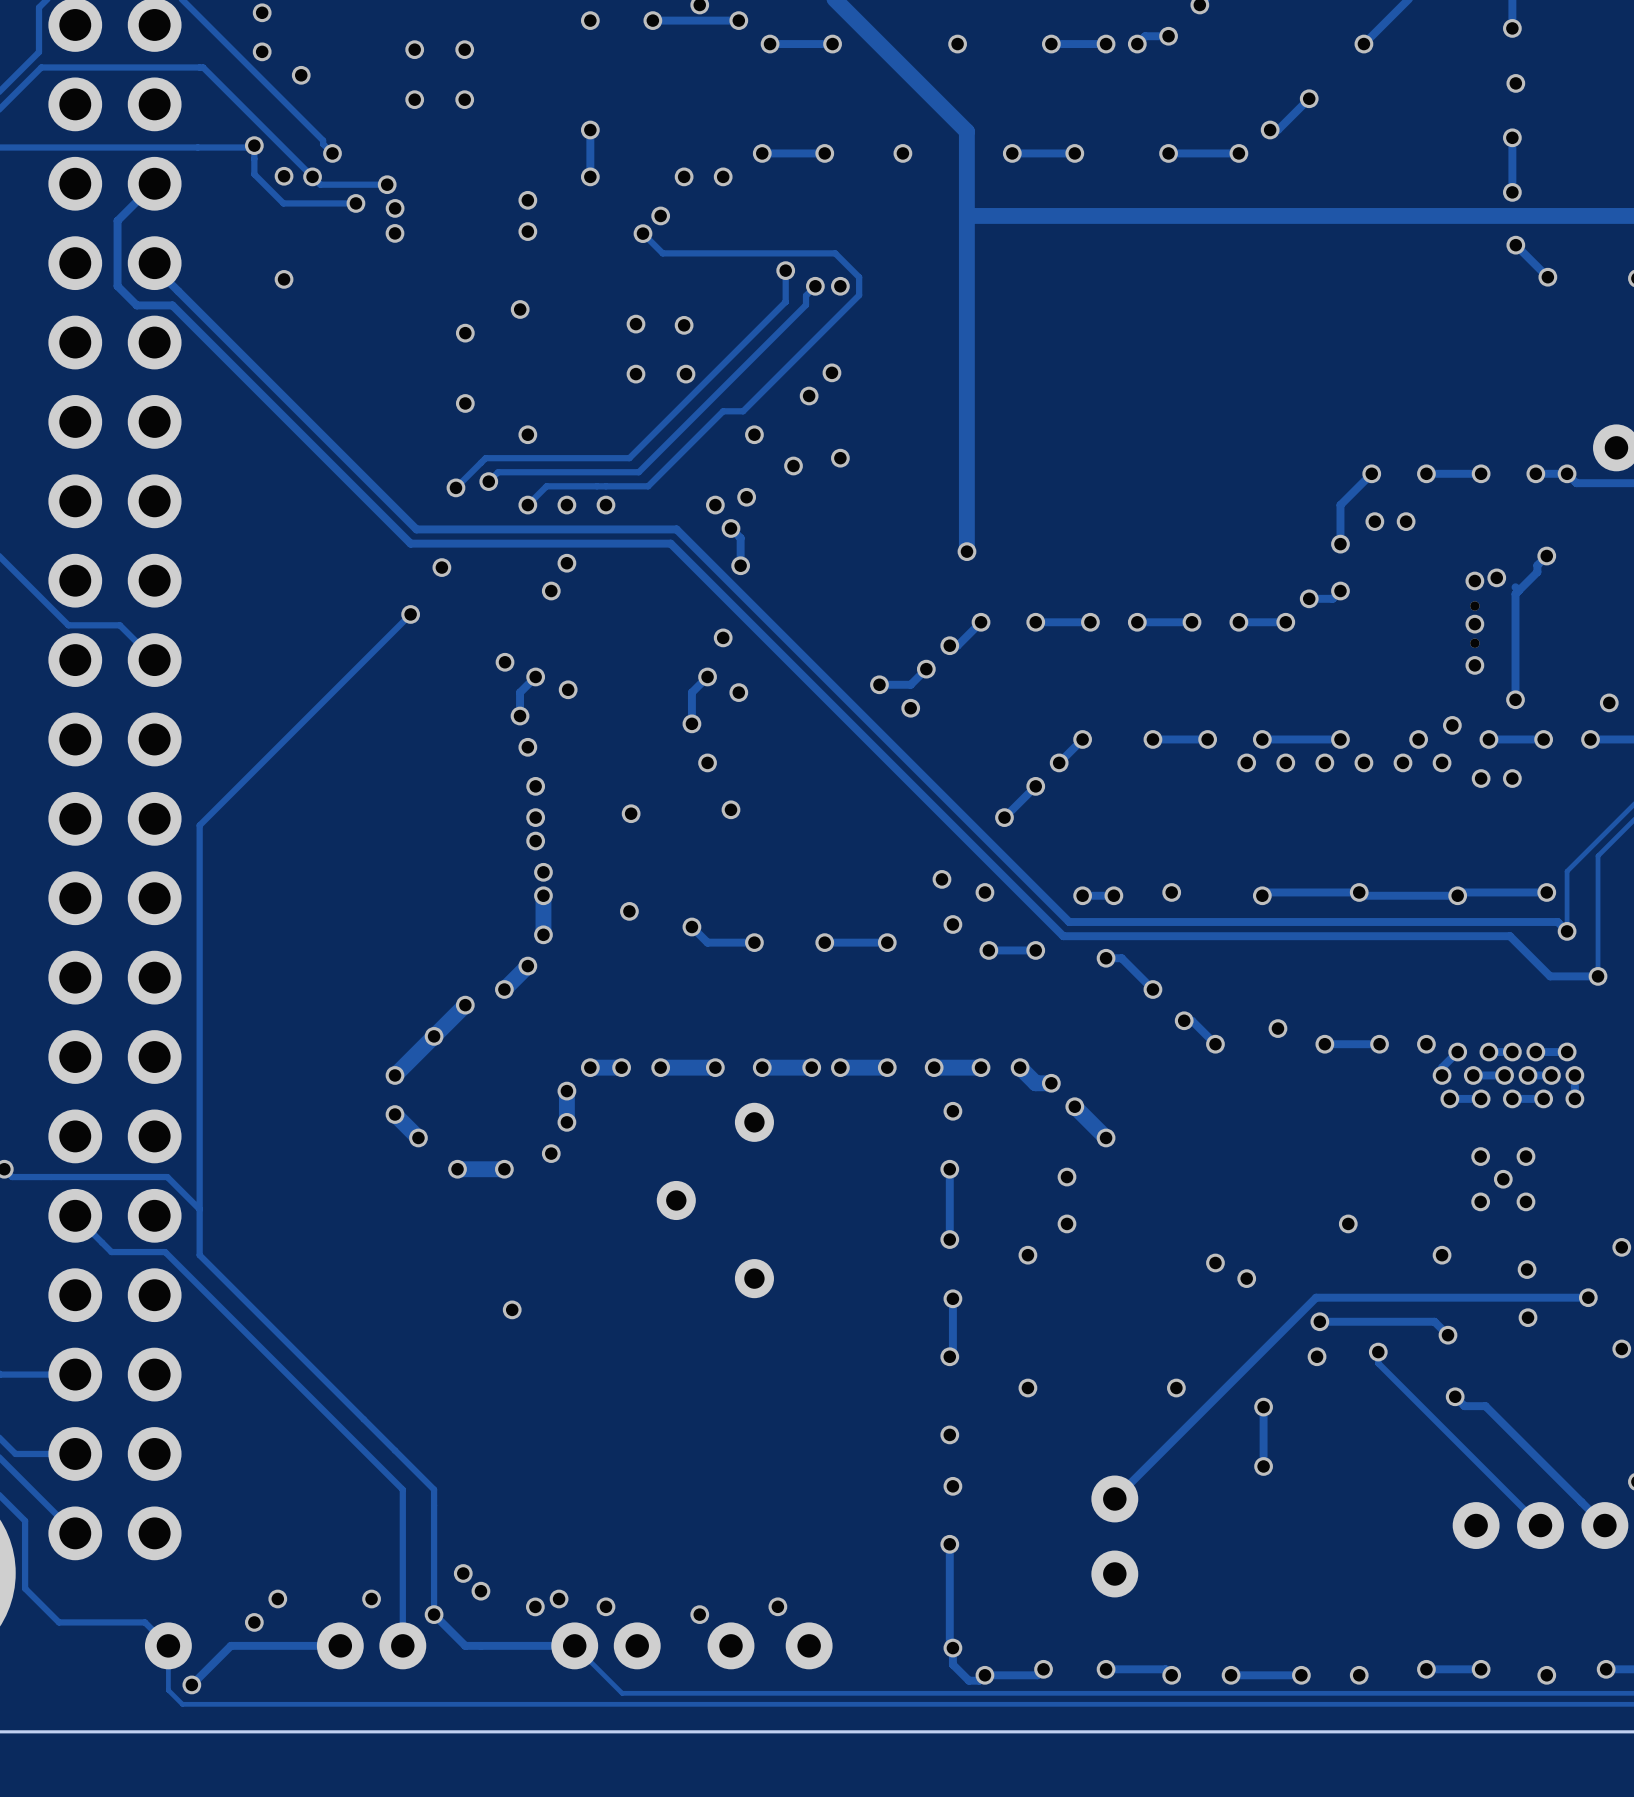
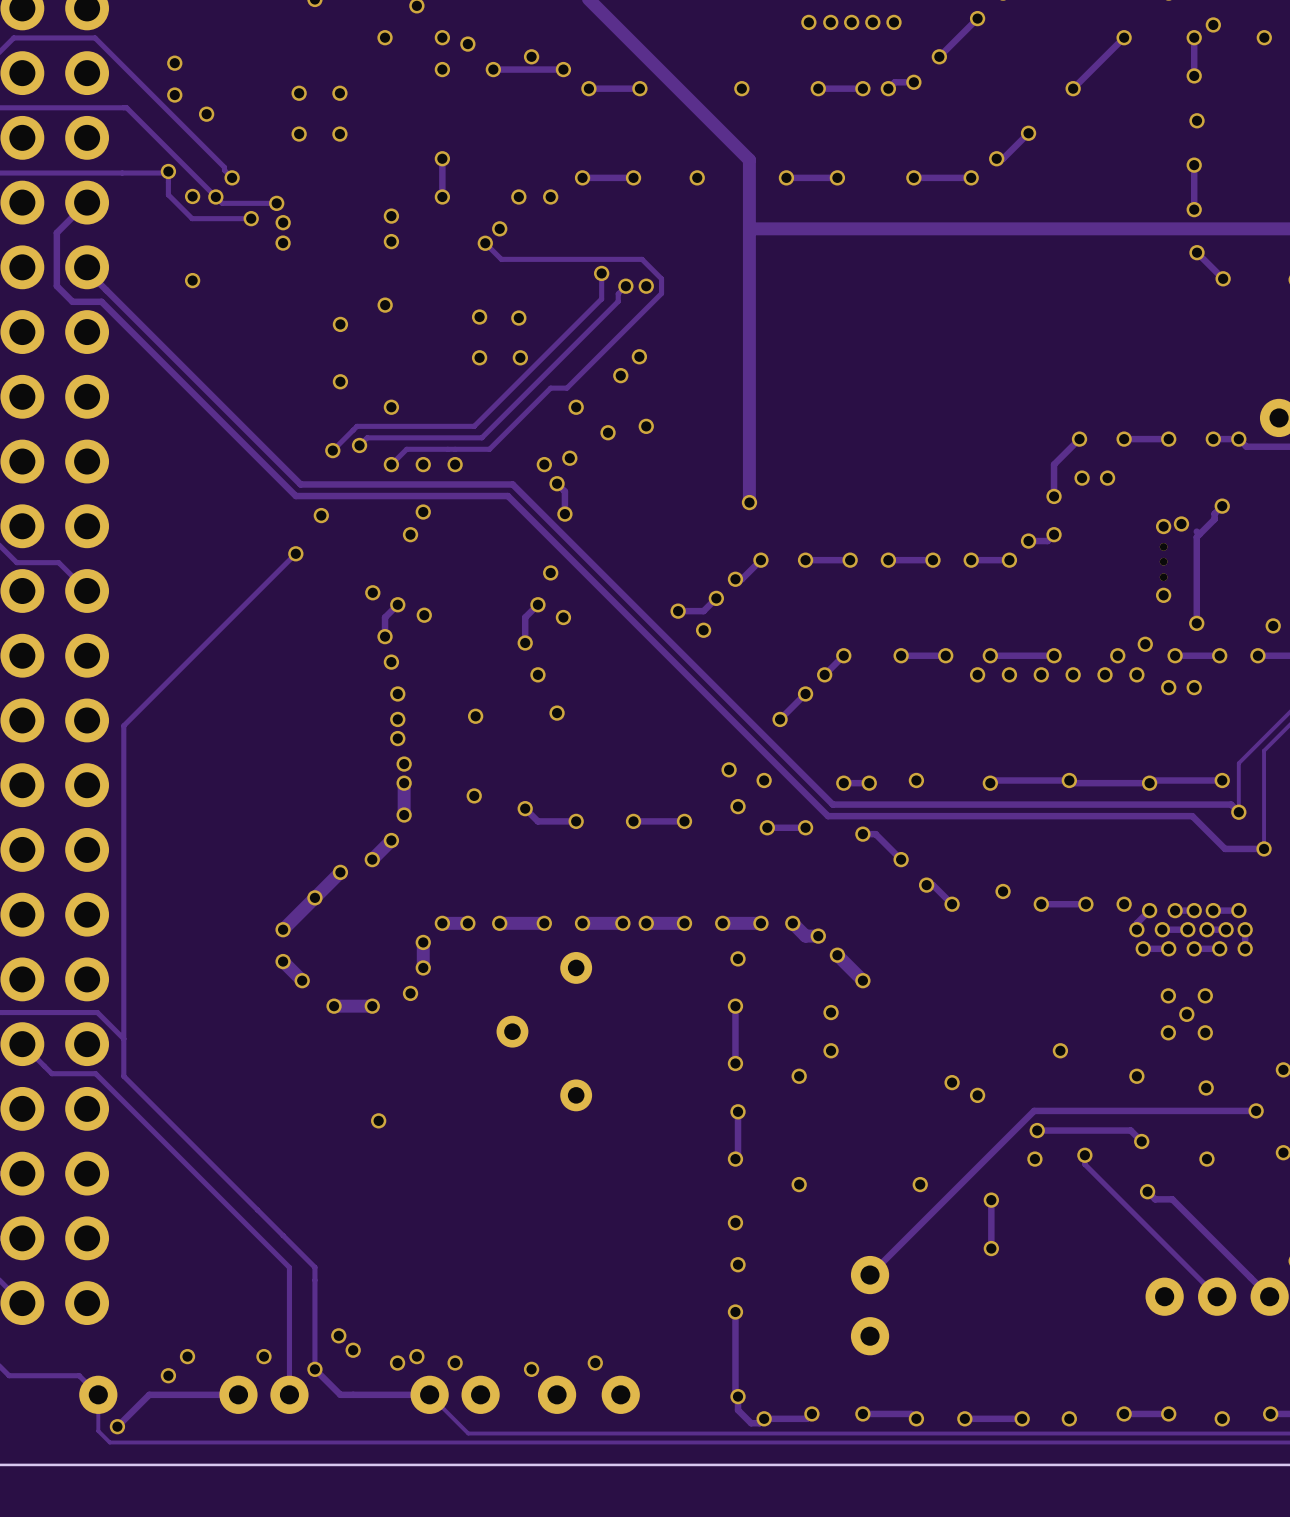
via: (1474, 624) -> none
via position: (1528, 1317) -> (1206, 1159)

